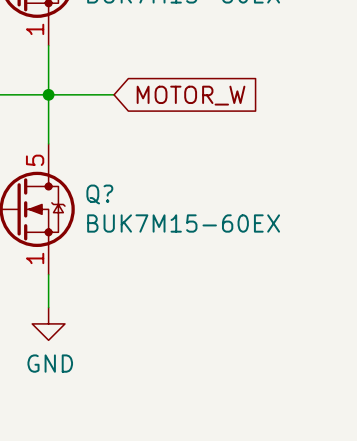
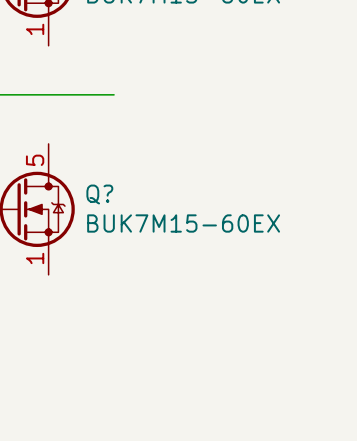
wire: (48, 45) (48, 143) -> none
junction: (48, 94) -> none
global label: MOTOR_W (191, 95) -> none
wire: (48, 274) (48, 307) -> none
power symbol: GND (48, 323) -> none

